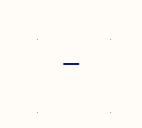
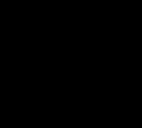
wire: (63, 63) (78, 63) -> none

